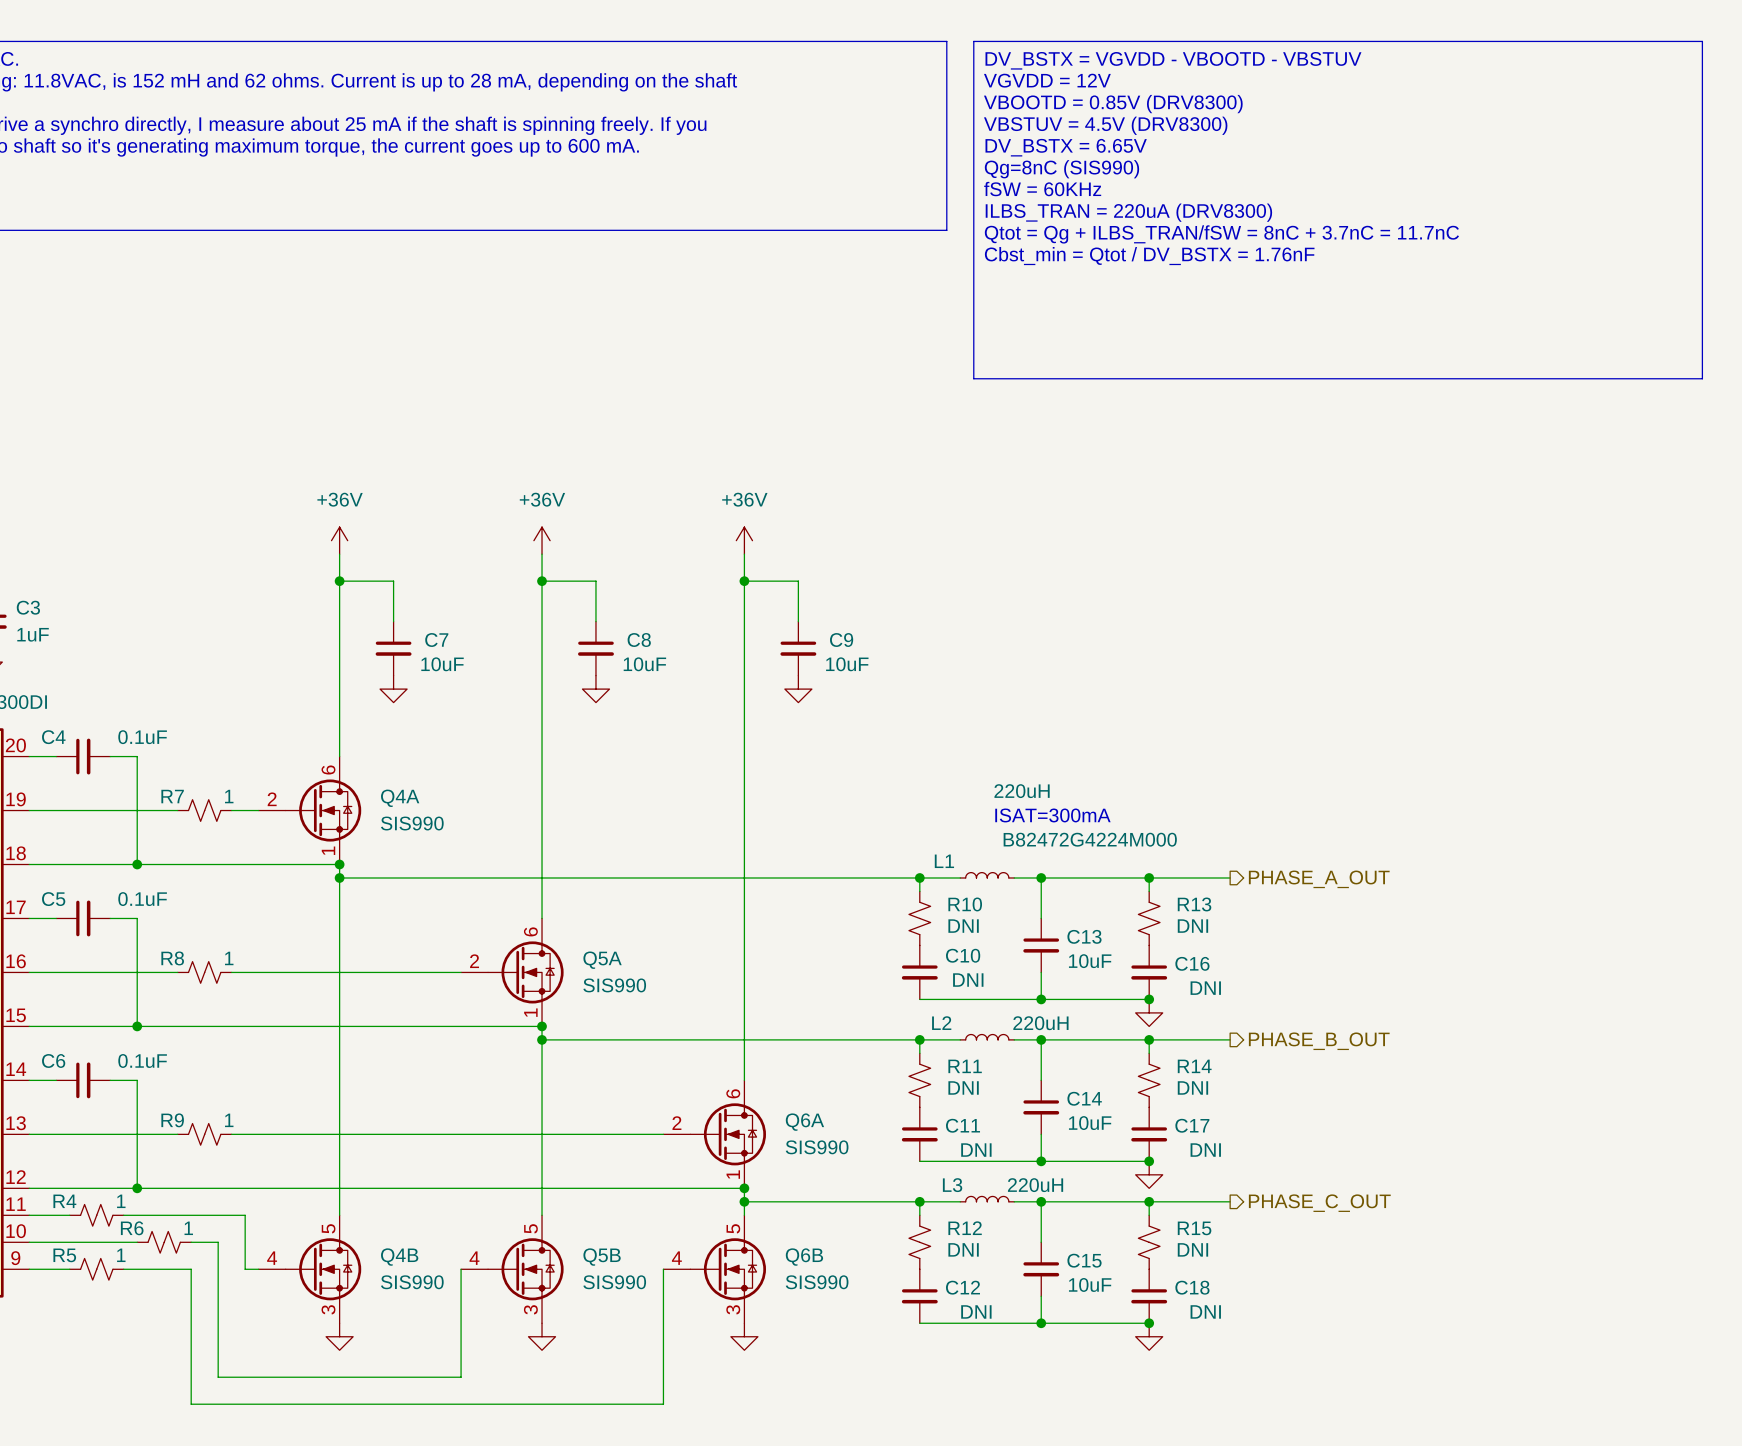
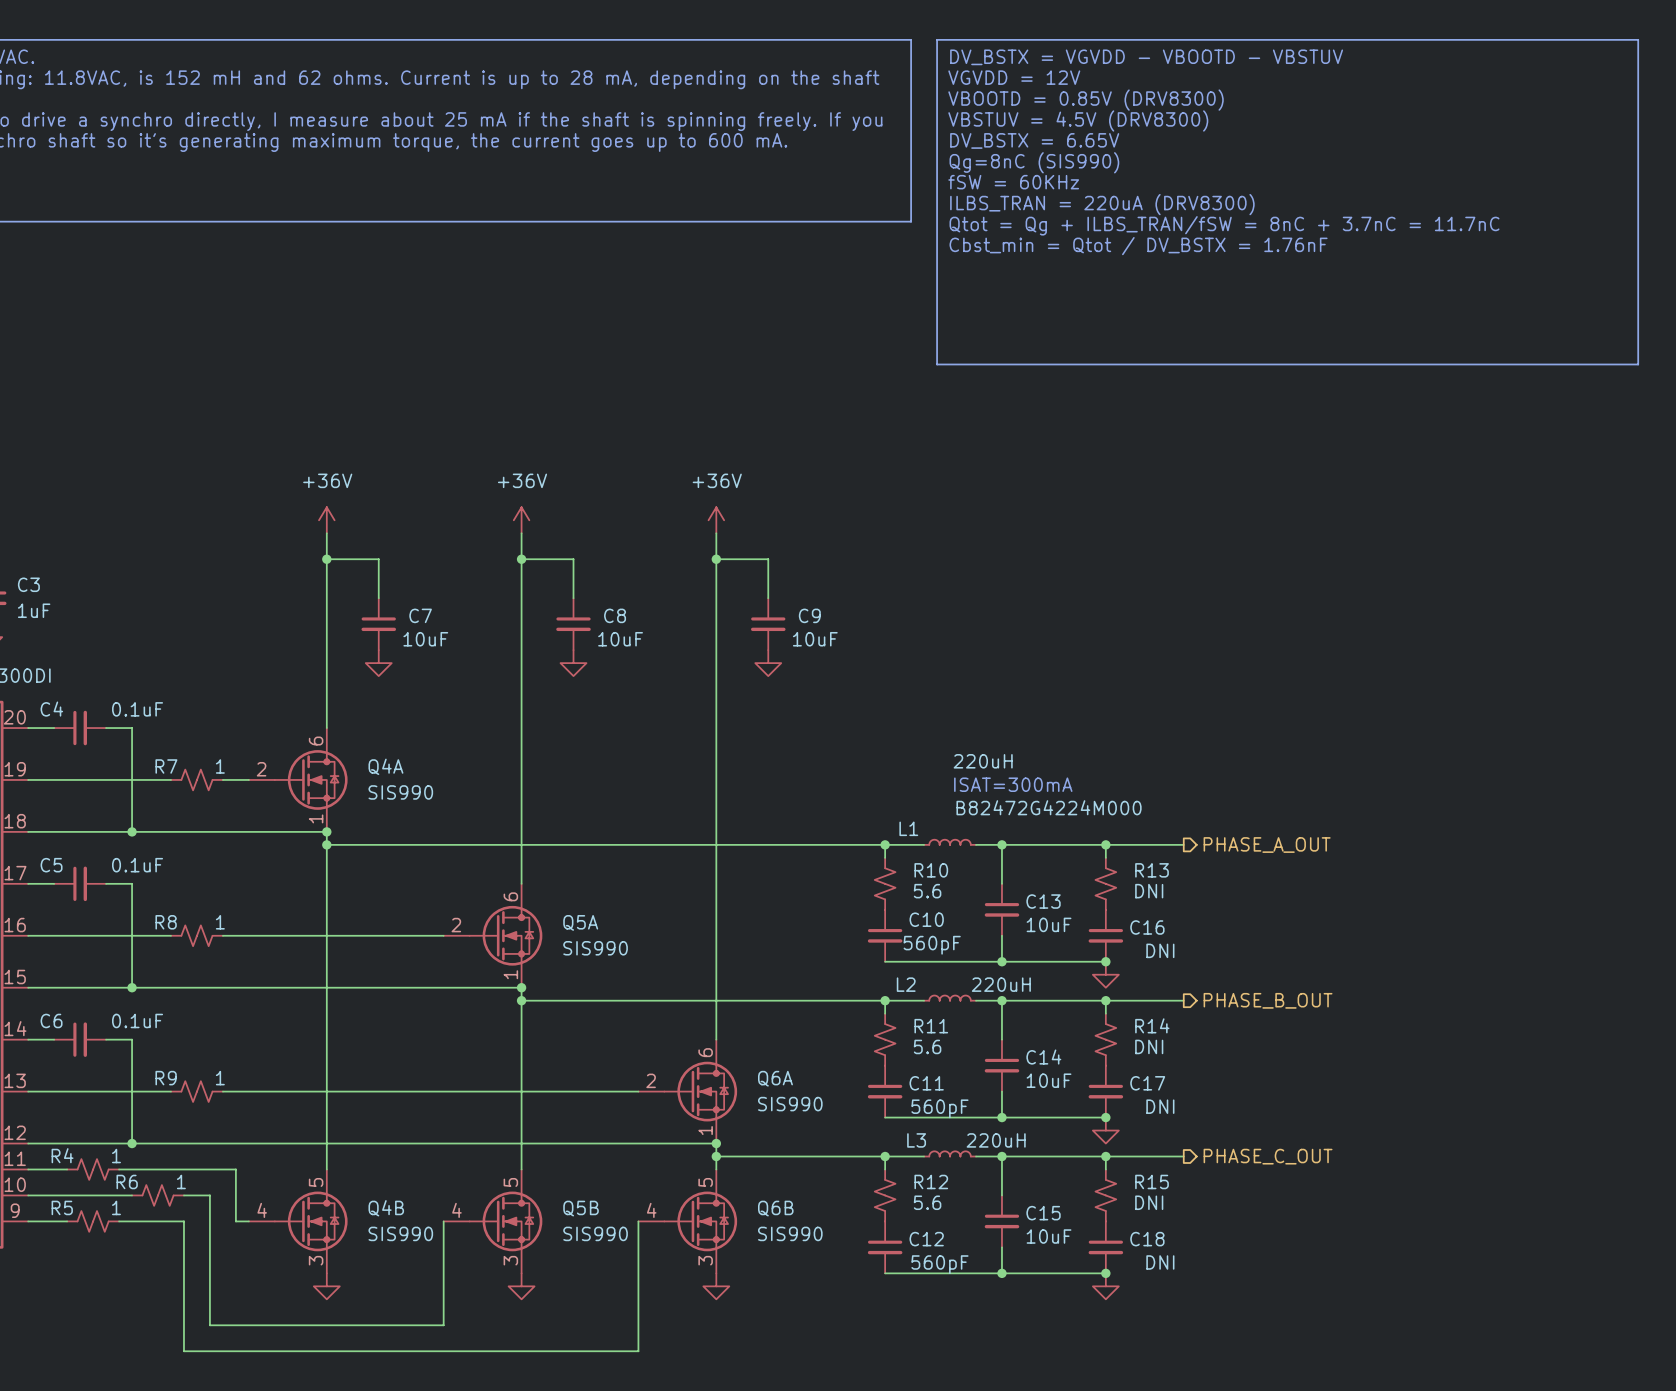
R10 value: DNI (963, 926) -> 5.6 (927, 891)
C10 value: DNI (968, 980) -> 560pF (932, 945)
R11 value: DNI (963, 1087) -> 5.6 (927, 1046)
C11 value: DNI (976, 1150) -> 560pF (939, 1108)
R12 value: DNI (963, 1249) -> 5.6 (927, 1202)
C12 value: DNI (976, 1311) -> 560pF (939, 1264)

